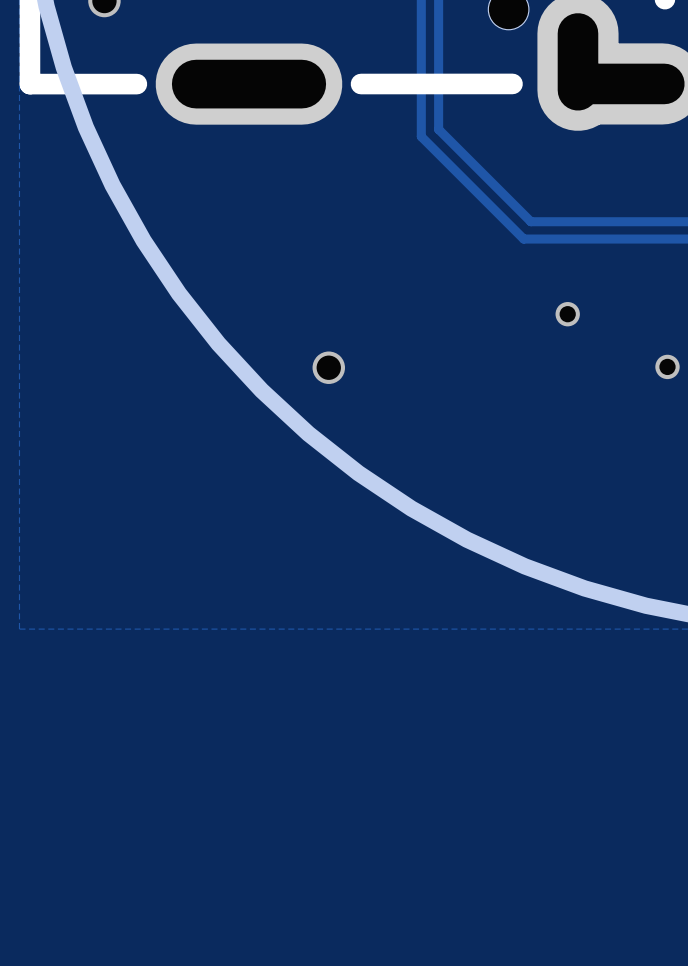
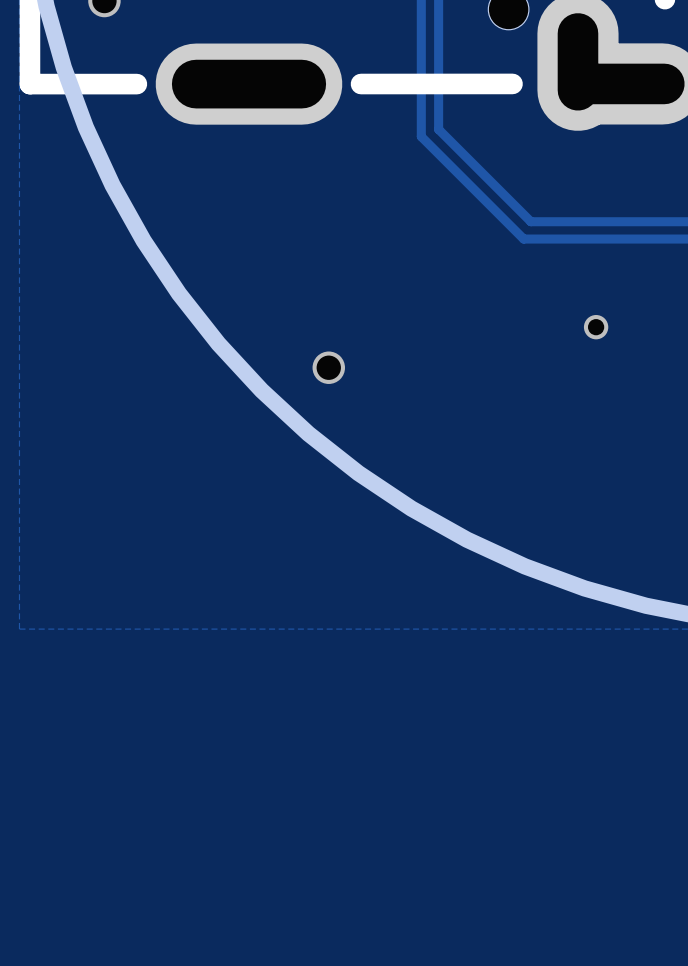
via position: (567, 314) -> (596, 327)
via: (667, 366) -> none

